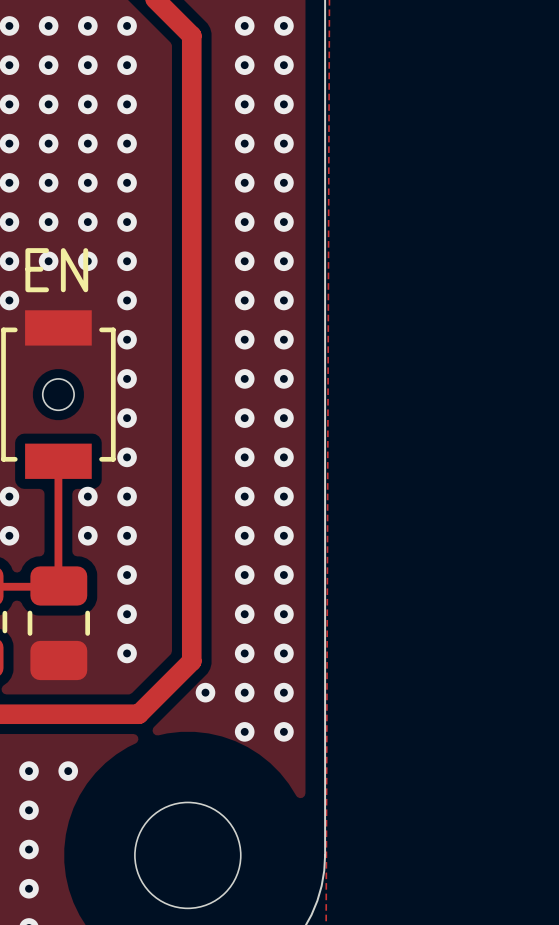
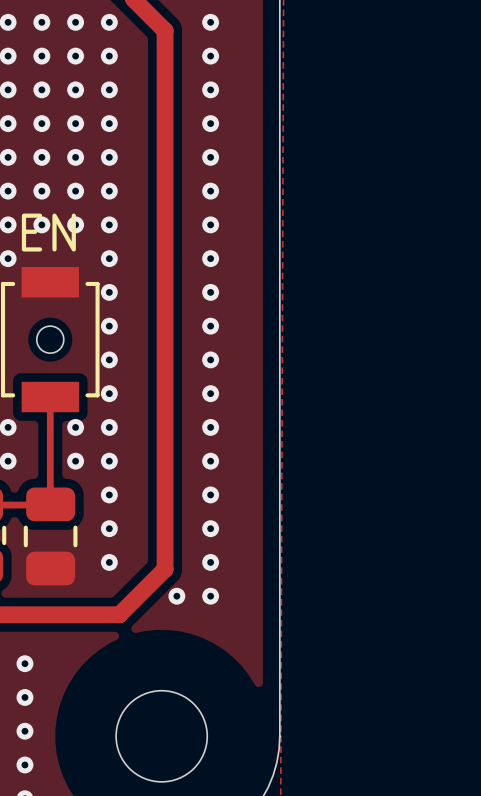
via: (283, 25) -> none
via: (283, 65) -> none
via: (283, 104) -> none
via: (283, 143) -> none
via: (283, 182) -> none
via: (283, 222) -> none
via: (283, 261) -> none
via: (283, 300) -> none
via: (283, 339) -> none
via: (283, 378) -> none
via: (283, 418) -> none
via: (283, 457) -> none
via: (283, 496) -> none
via: (283, 535) -> none
via: (283, 575) -> none
via: (283, 614) -> none
via: (283, 653) -> none
via: (283, 692) -> none
via: (244, 731) -> none
via: (283, 731) -> none
via: (68, 771) -> none

